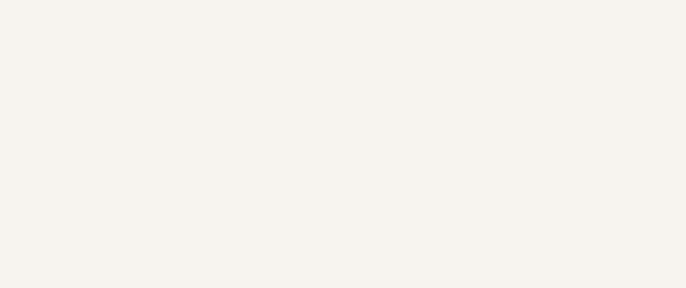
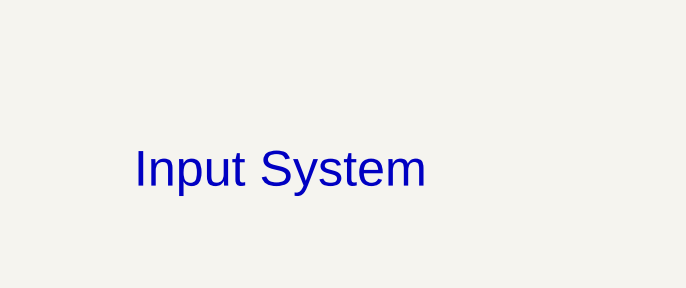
text: none -> Input System (281, 173)

